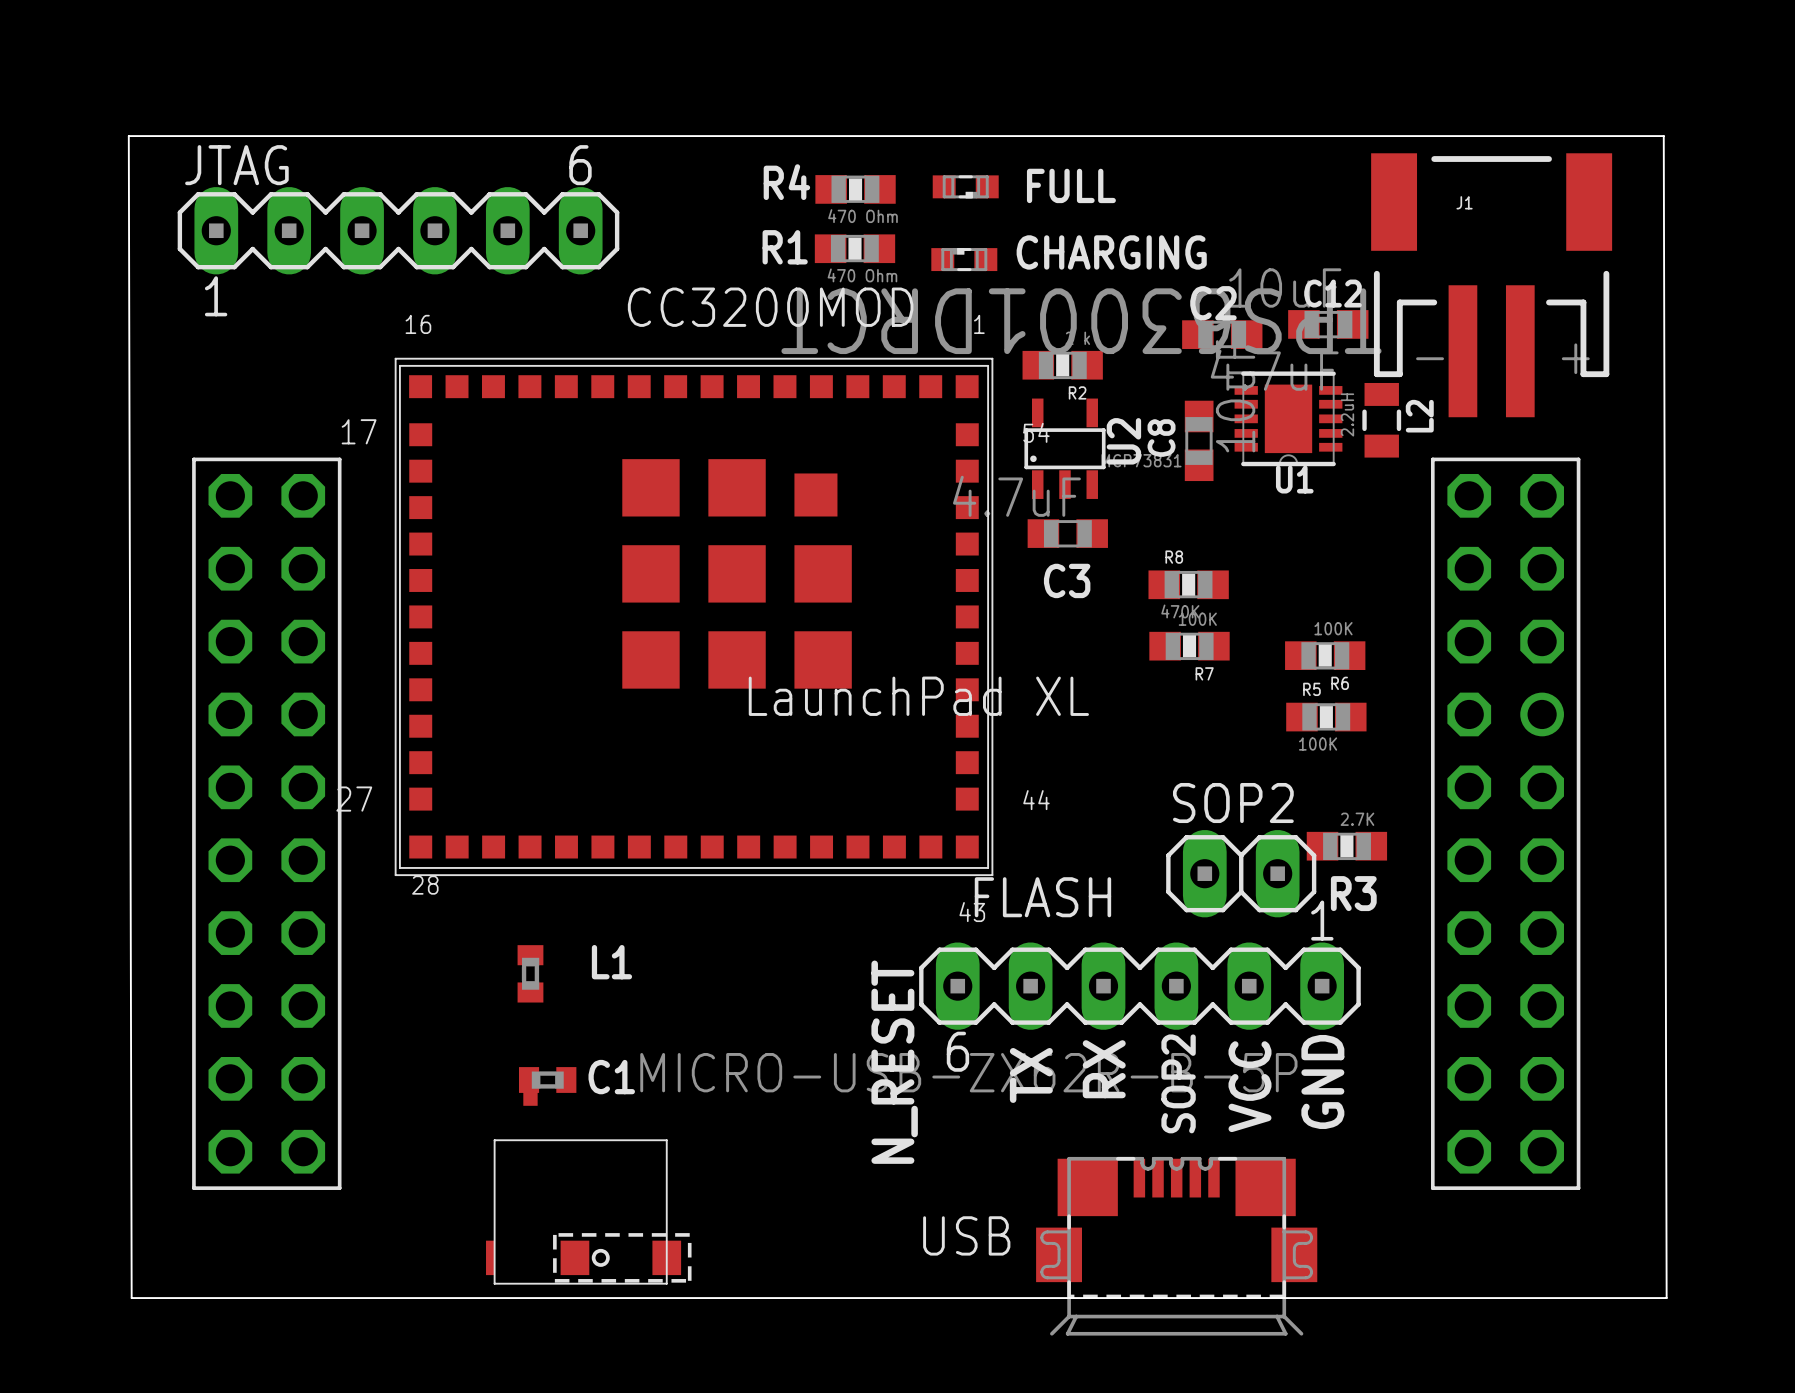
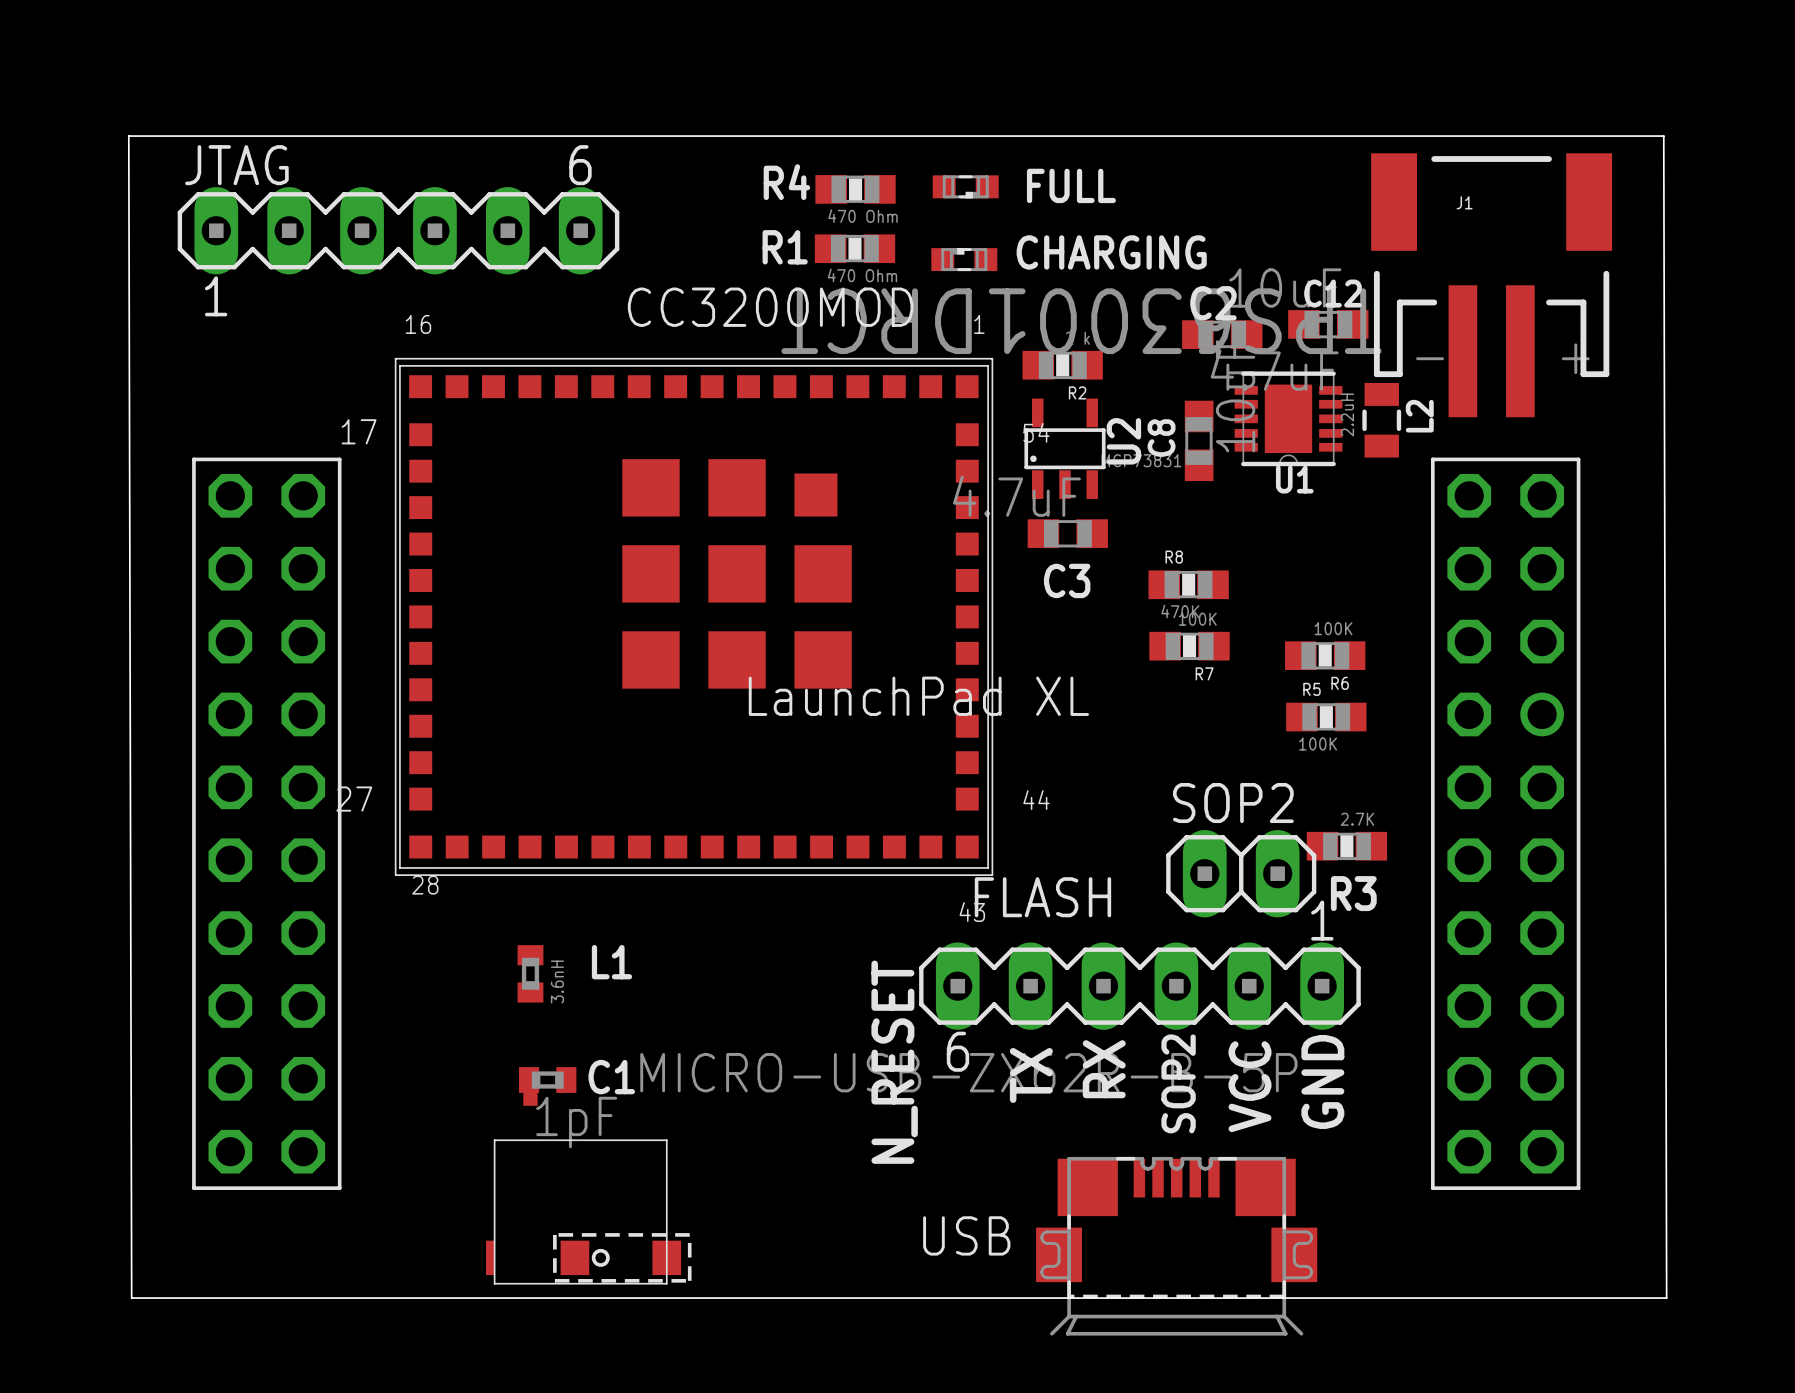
L1 value: none -> 3.6nH (557, 981)
C1 value: none -> 1pF (576, 1122)

